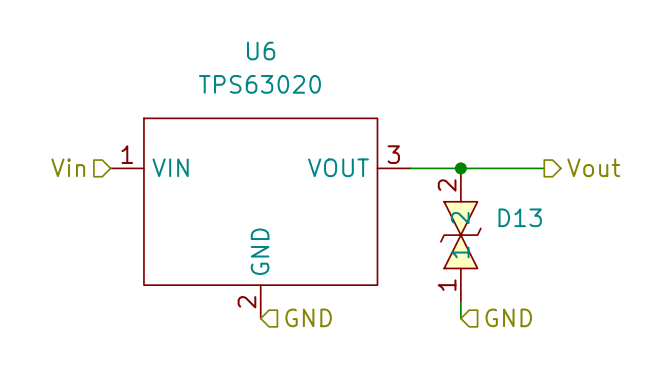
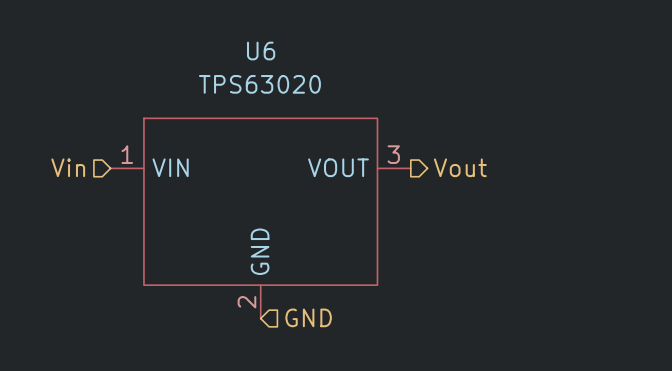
hierarchical label position: Vout (593, 167) -> Vout (460, 167)
wire: (410, 168) (544, 168) -> none
junction: (460, 168) -> none
D13: (460, 235) -> none
wire: (460, 301) (460, 318) -> none
hierarchical label: GND (508, 317) -> none

